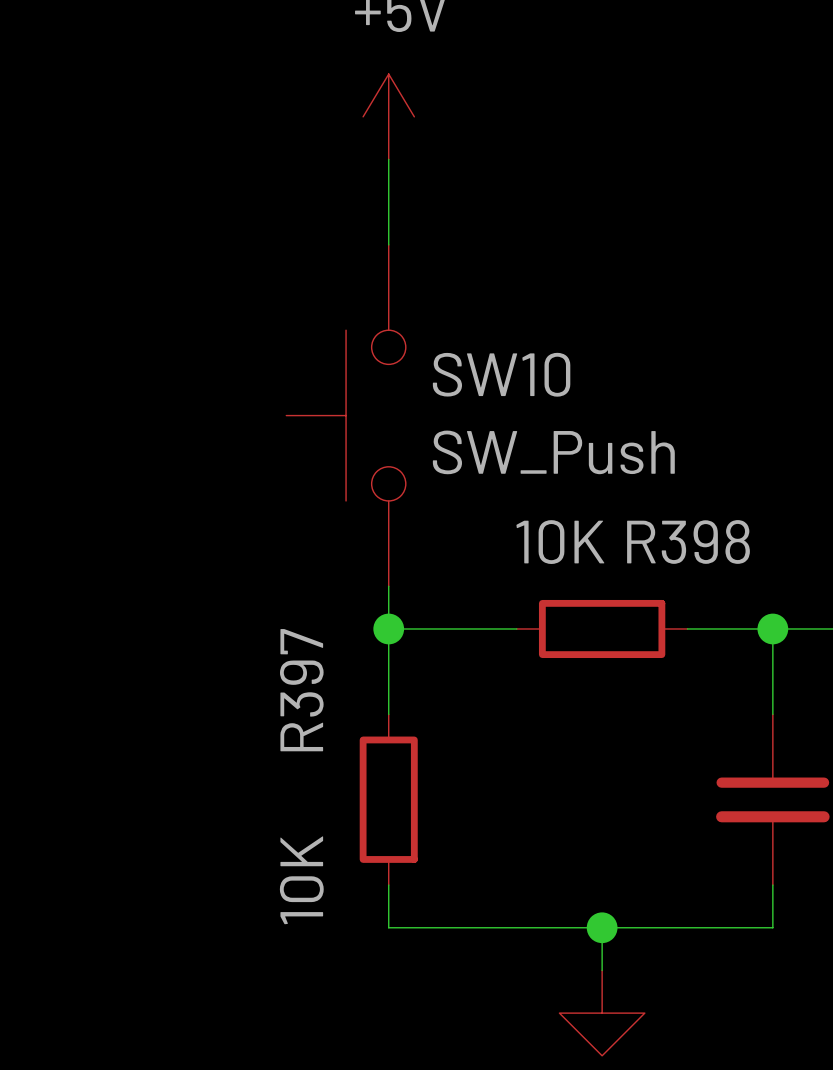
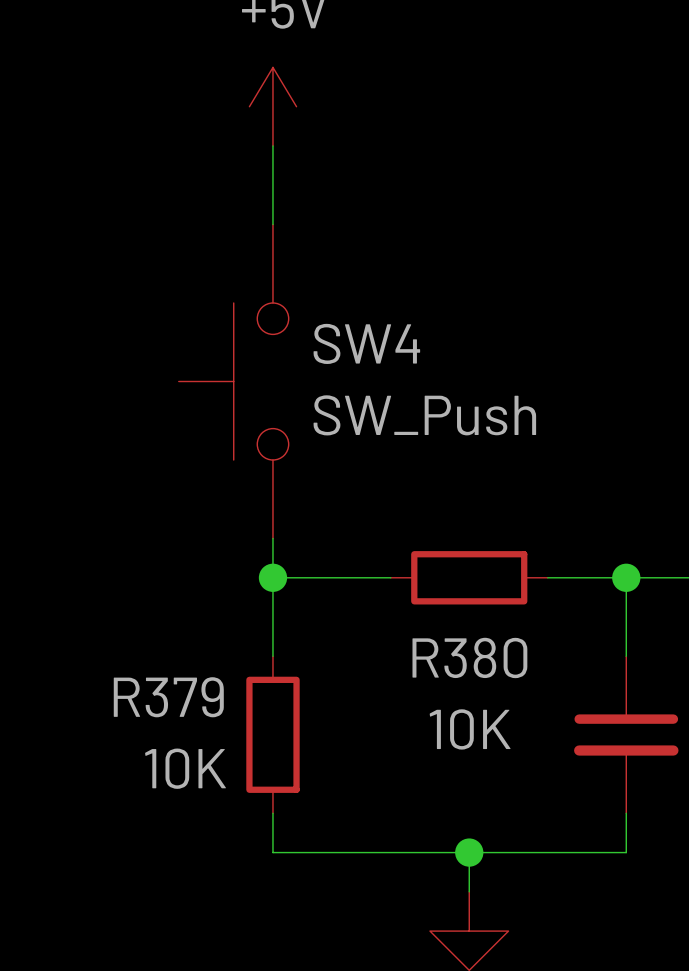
SW10 name: SW10 (501, 374) -> SW4 (366, 343)
R398 name: R398 (688, 541) -> R380 (469, 657)
R398 value position: 10K (560, 542) -> 10K (470, 729)
R397 name: R397 (301, 690) -> R379 (168, 697)
R397 value rotation: 0° (301, 880) -> 90° clockwise (185, 768)

